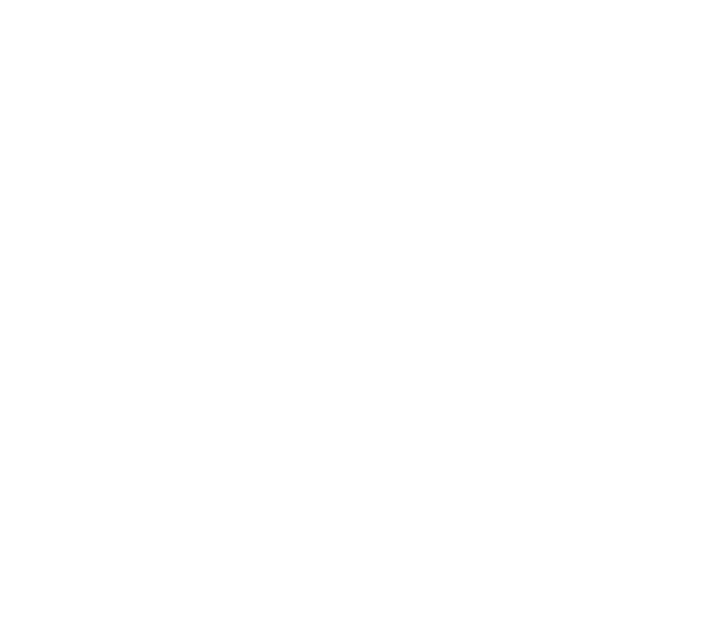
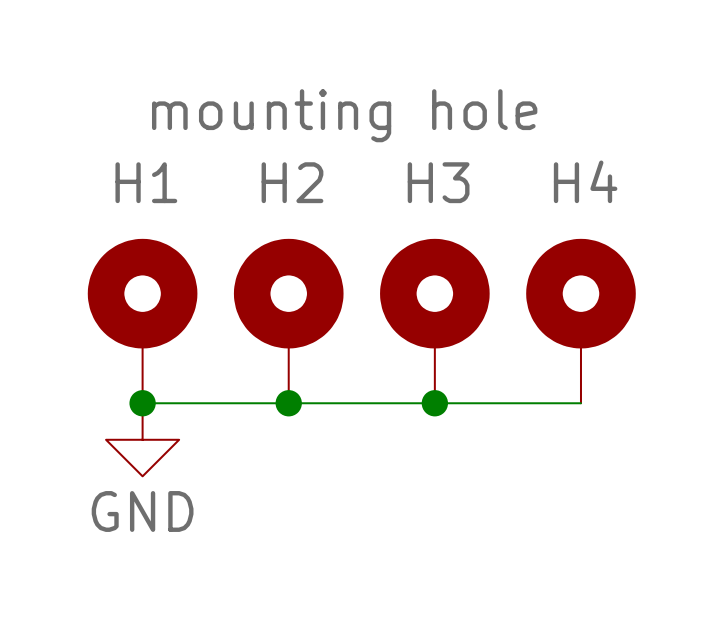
H1: none -> mounting hole (142, 321)
H2: none -> (288, 321)
H3: none -> (434, 321)
H4: none -> (580, 321)
wire: none -> (142, 403) (580, 403)
junction: none -> (142, 403)
junction: none -> (288, 403)
junction: none -> (434, 403)
power symbol: none -> GND (142, 439)

